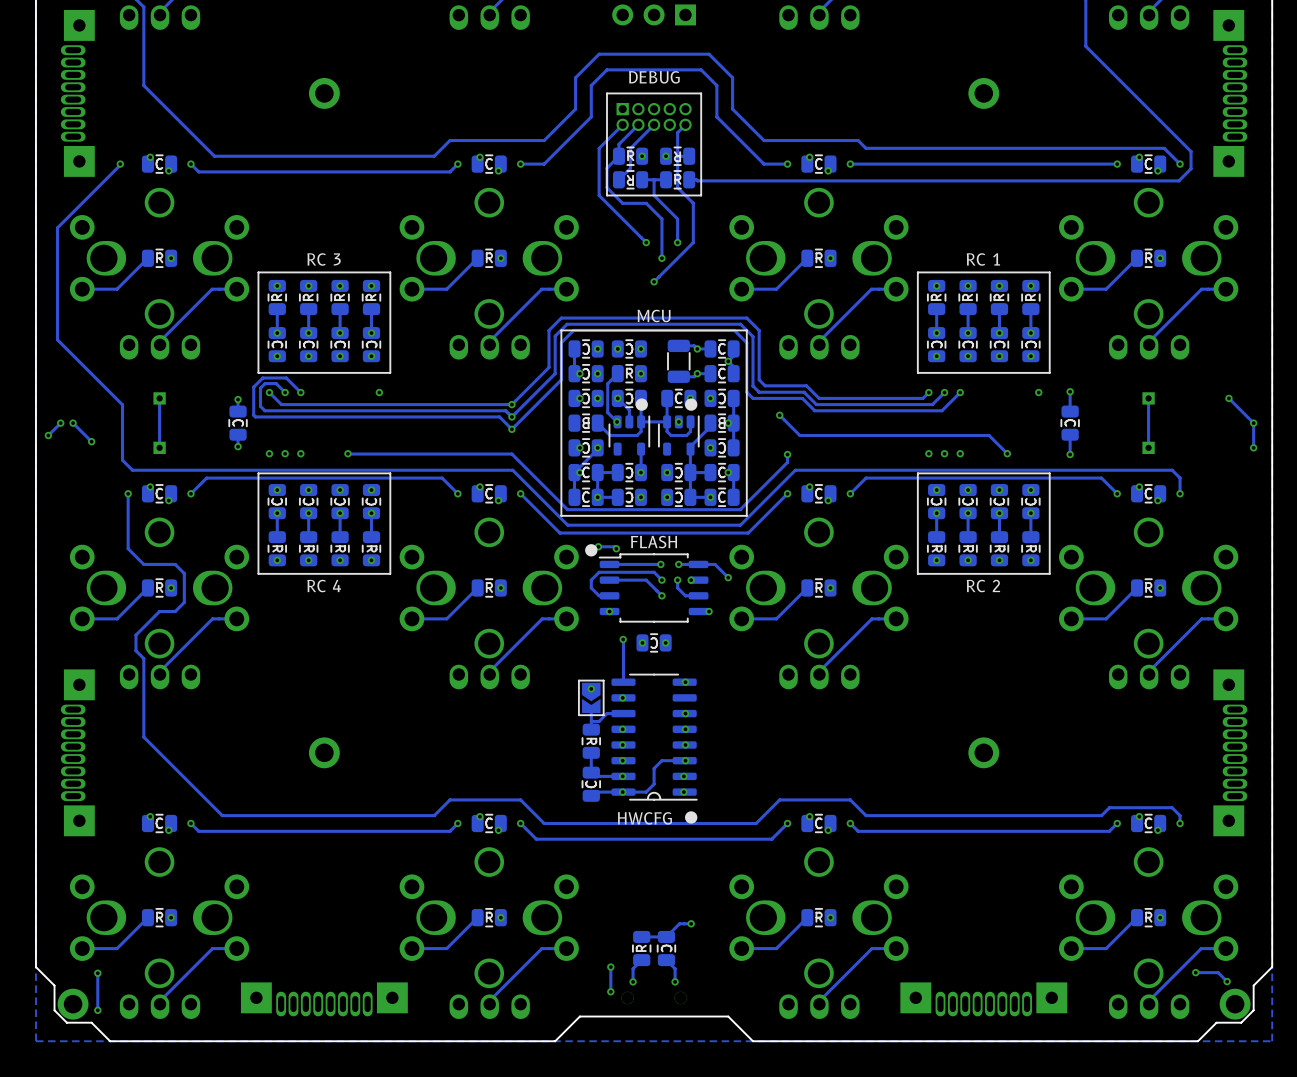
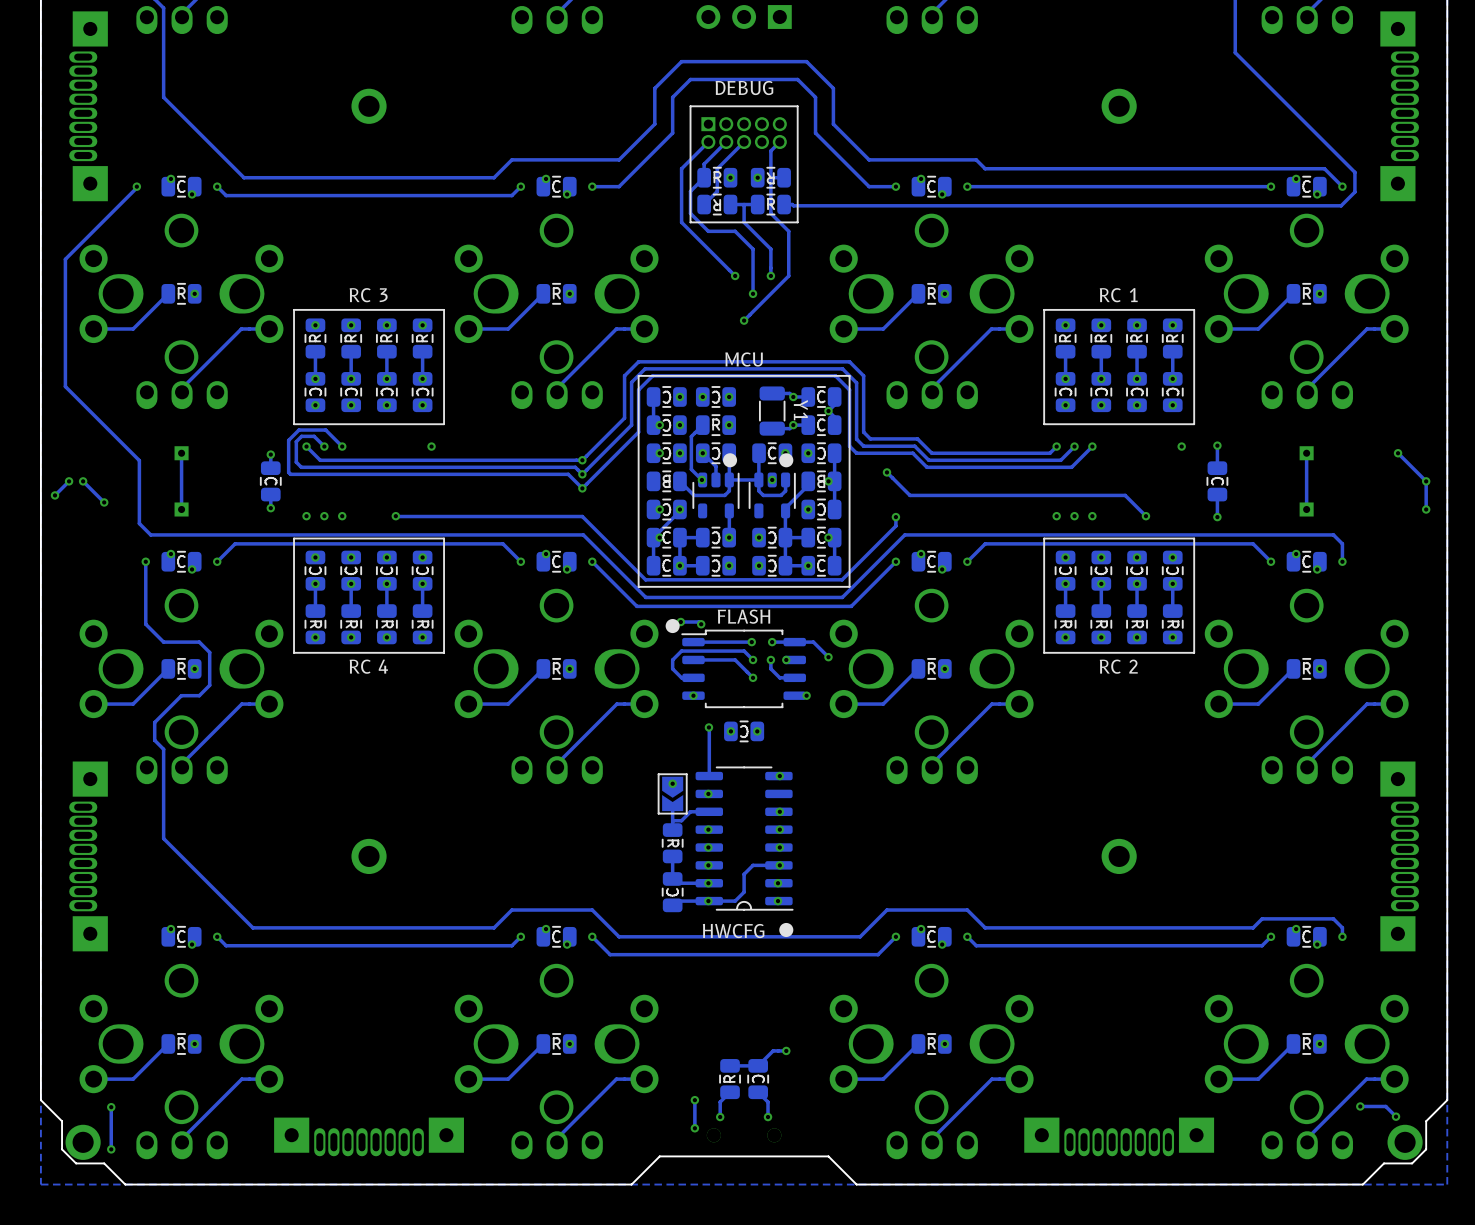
Y1 name: none -> Y1 (800, 410)

